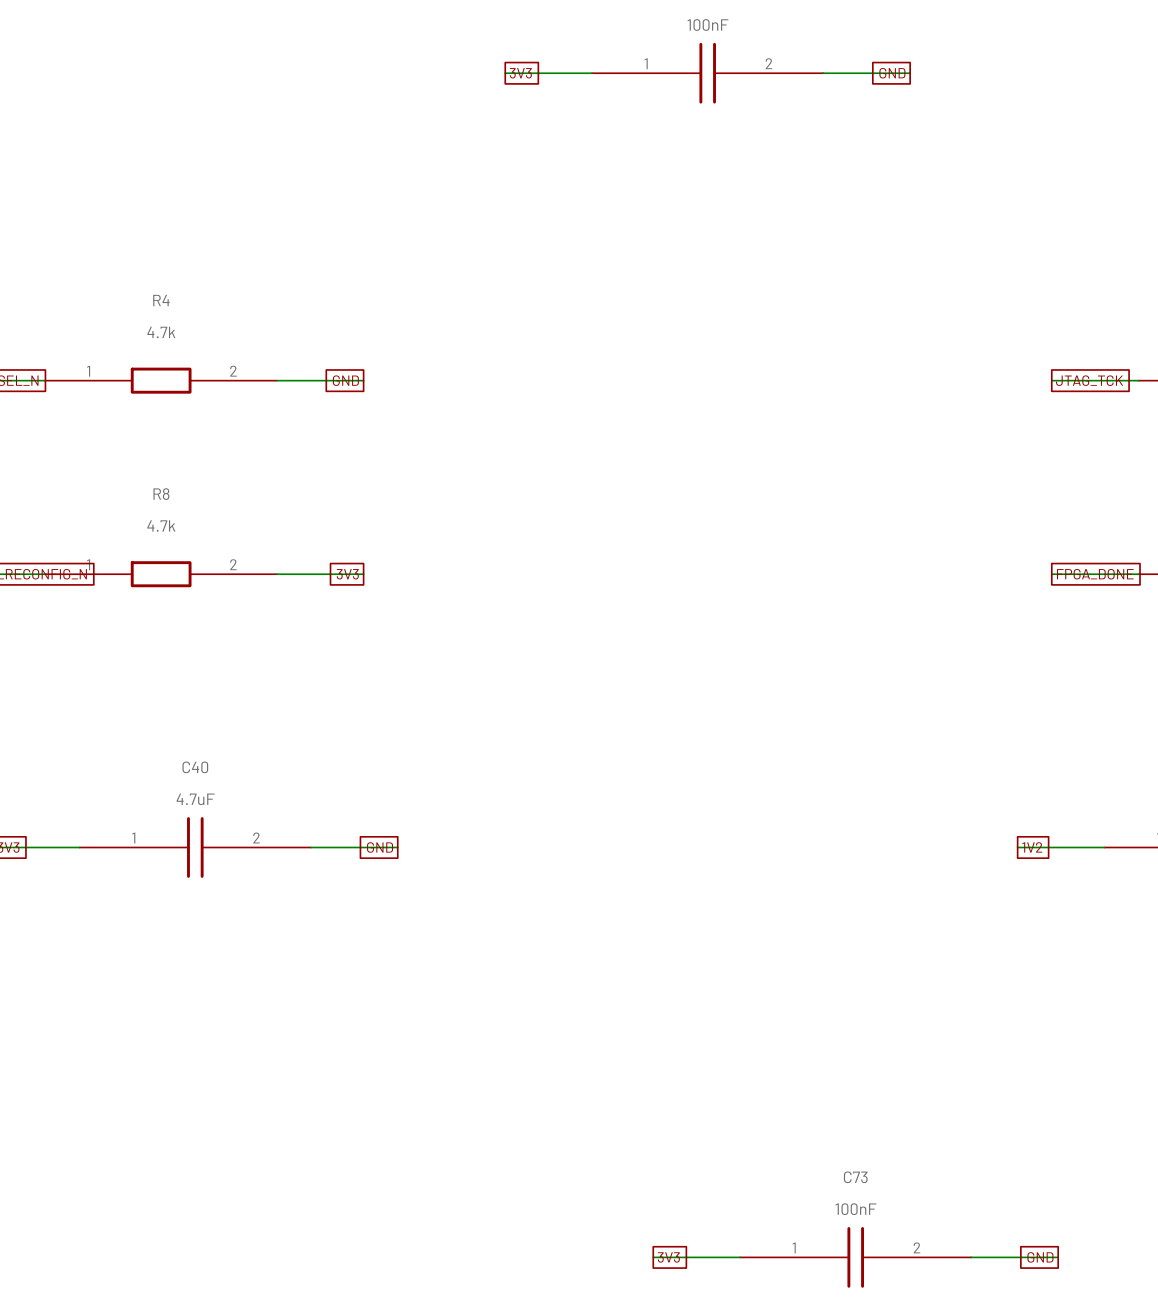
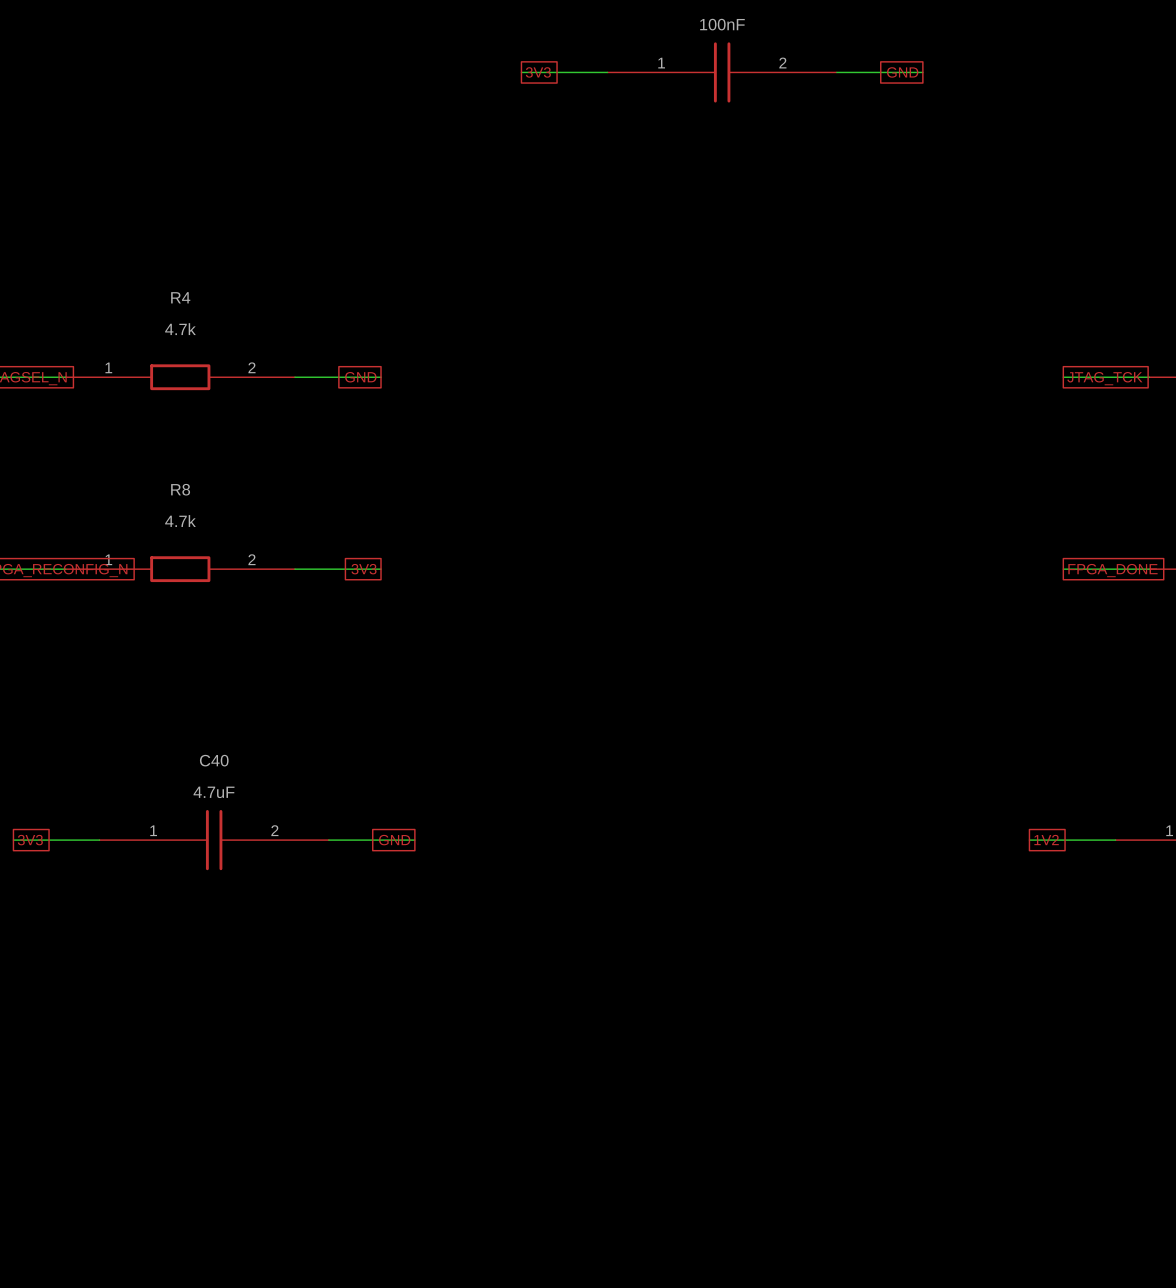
wire: (653, 1257) (740, 1257) -> none
global label: 3V3 (668, 1257) -> none
C73: 100nF (855, 1257) -> none
wire: (971, 1257) (1058, 1257) -> none
global label: GND (1040, 1257) -> none

